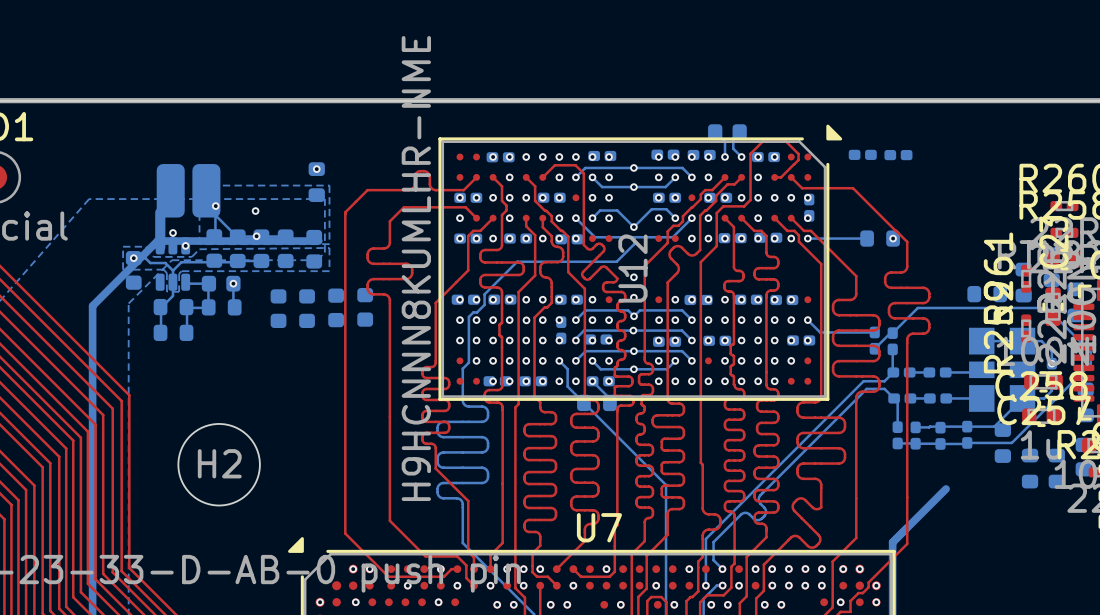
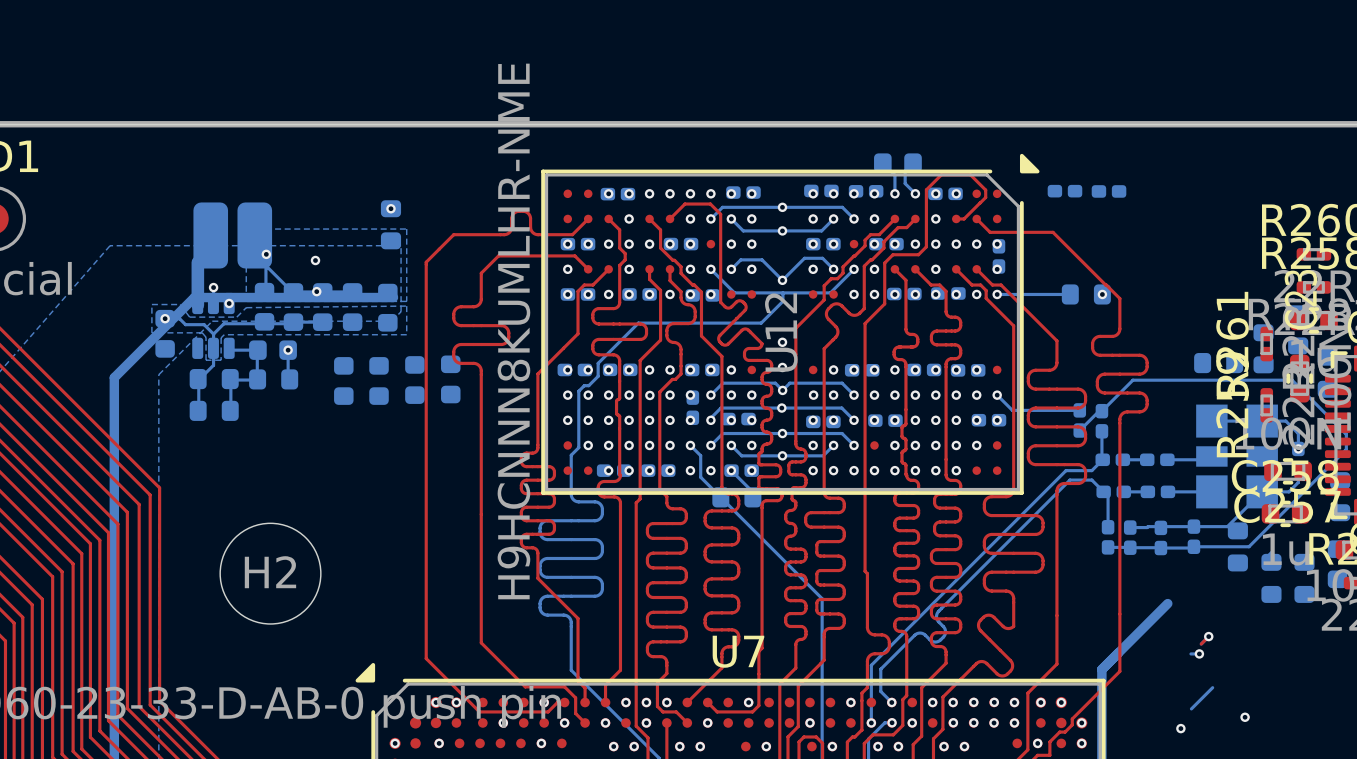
top track: none -> (1208, 636) (1201, 644)
via: none -> (1208, 636)
bottom track: none -> (1190, 653) (1199, 653)
via: none -> (1199, 653)
bottom track: none -> (1212, 687) (1191, 708)
via: none -> (1245, 717)
via: none -> (1180, 728)

